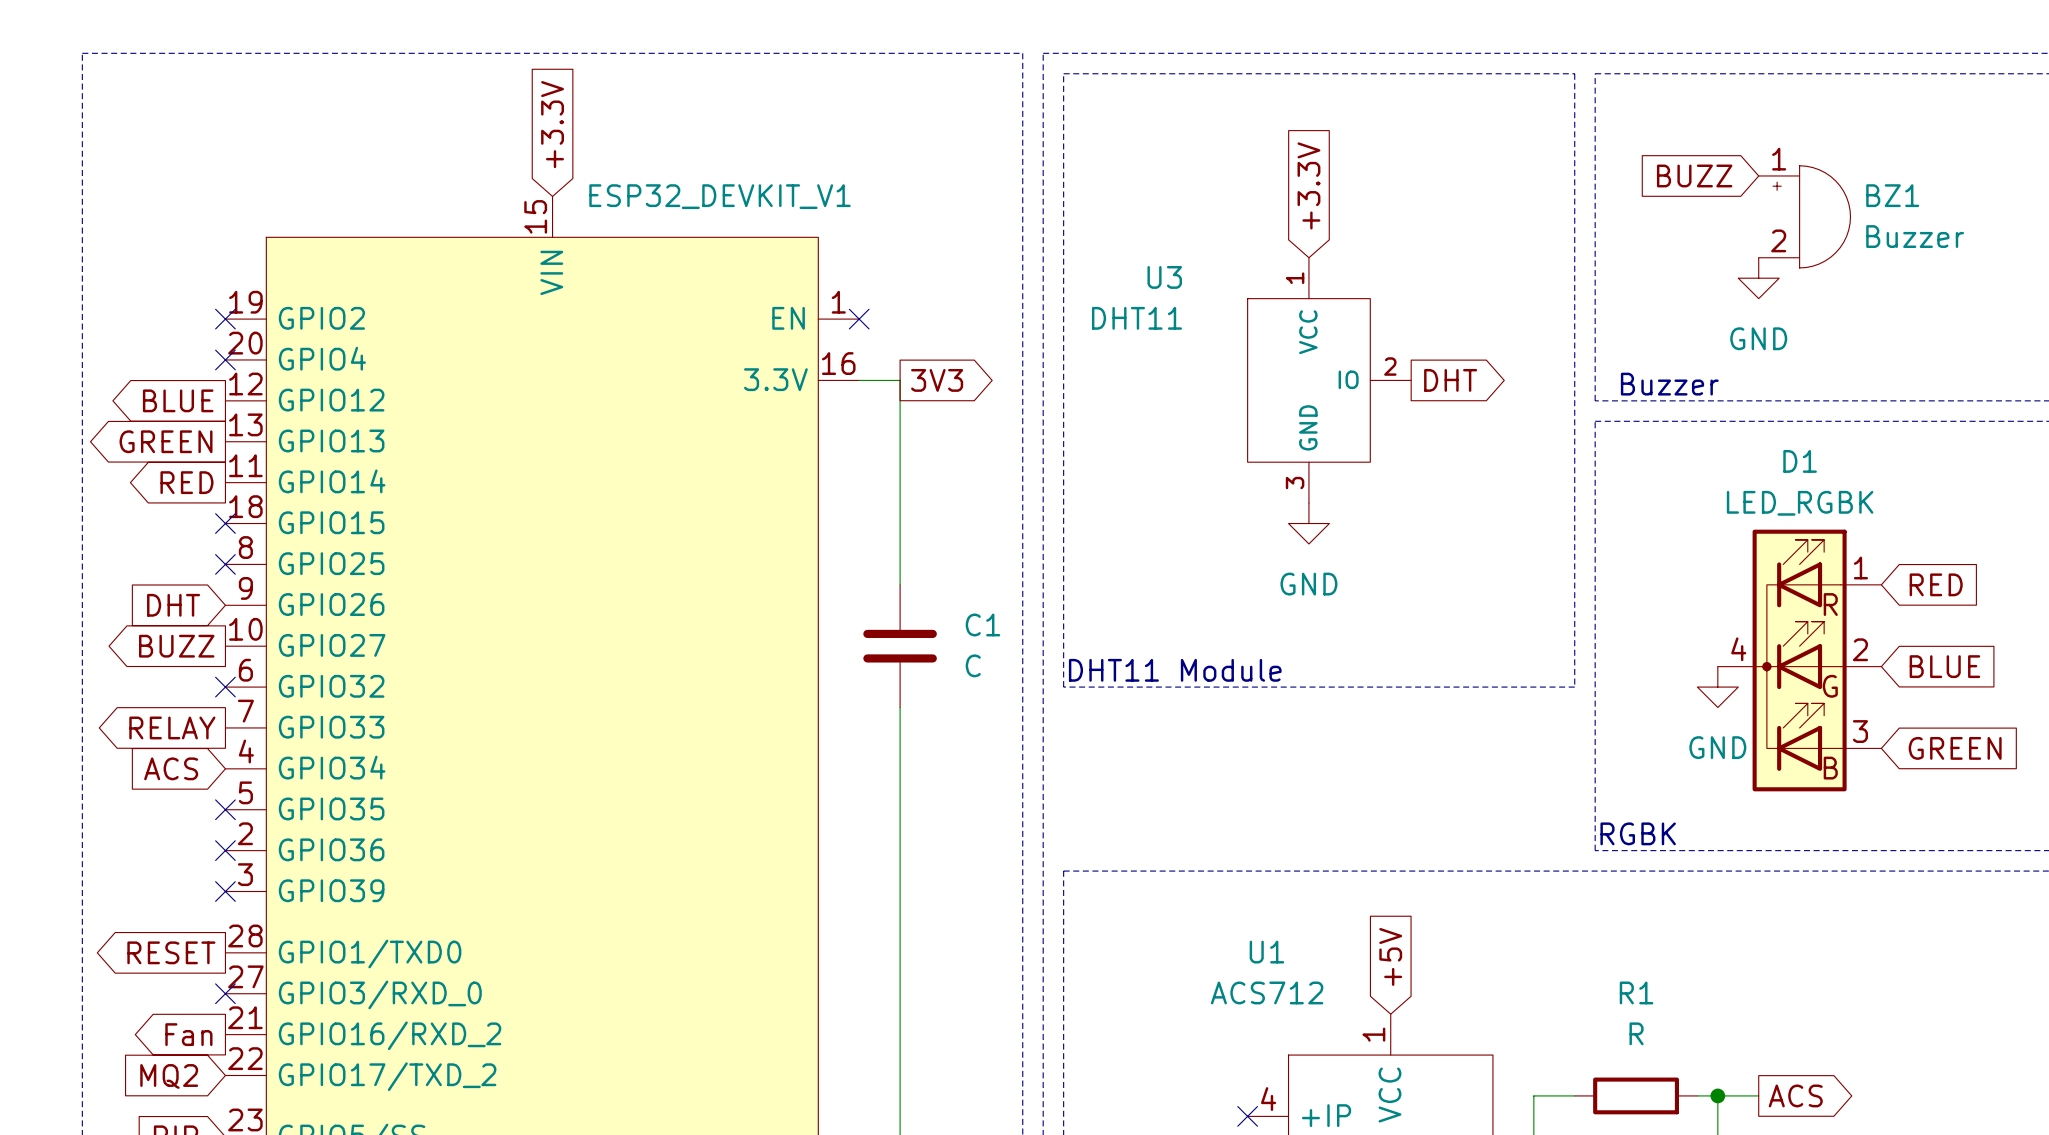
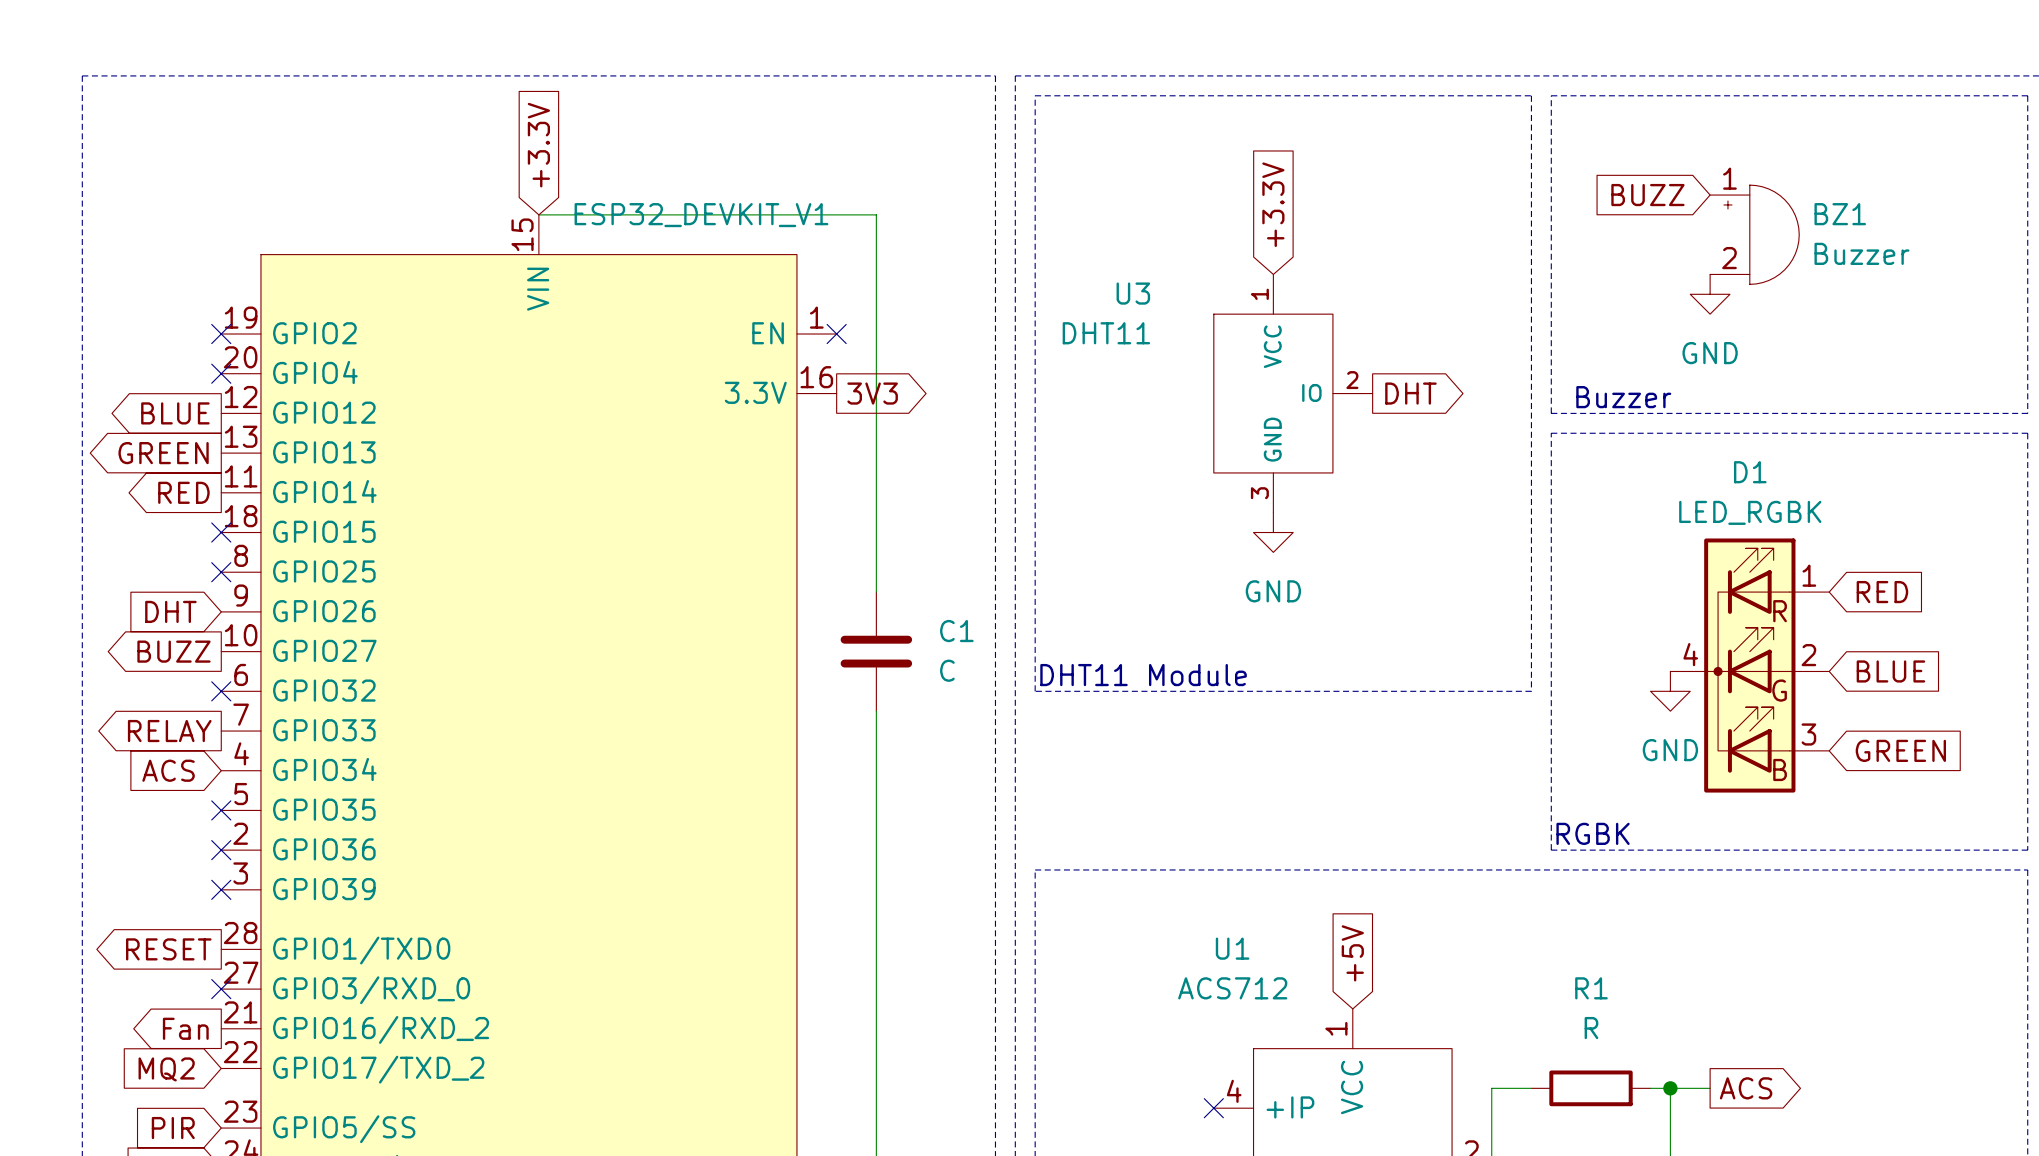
wire: (859, 380) (900, 380) -> (538, 214) (876, 214) (876, 393)
global label position: 3V3 (937, 380) -> 3V3 (872, 393)

